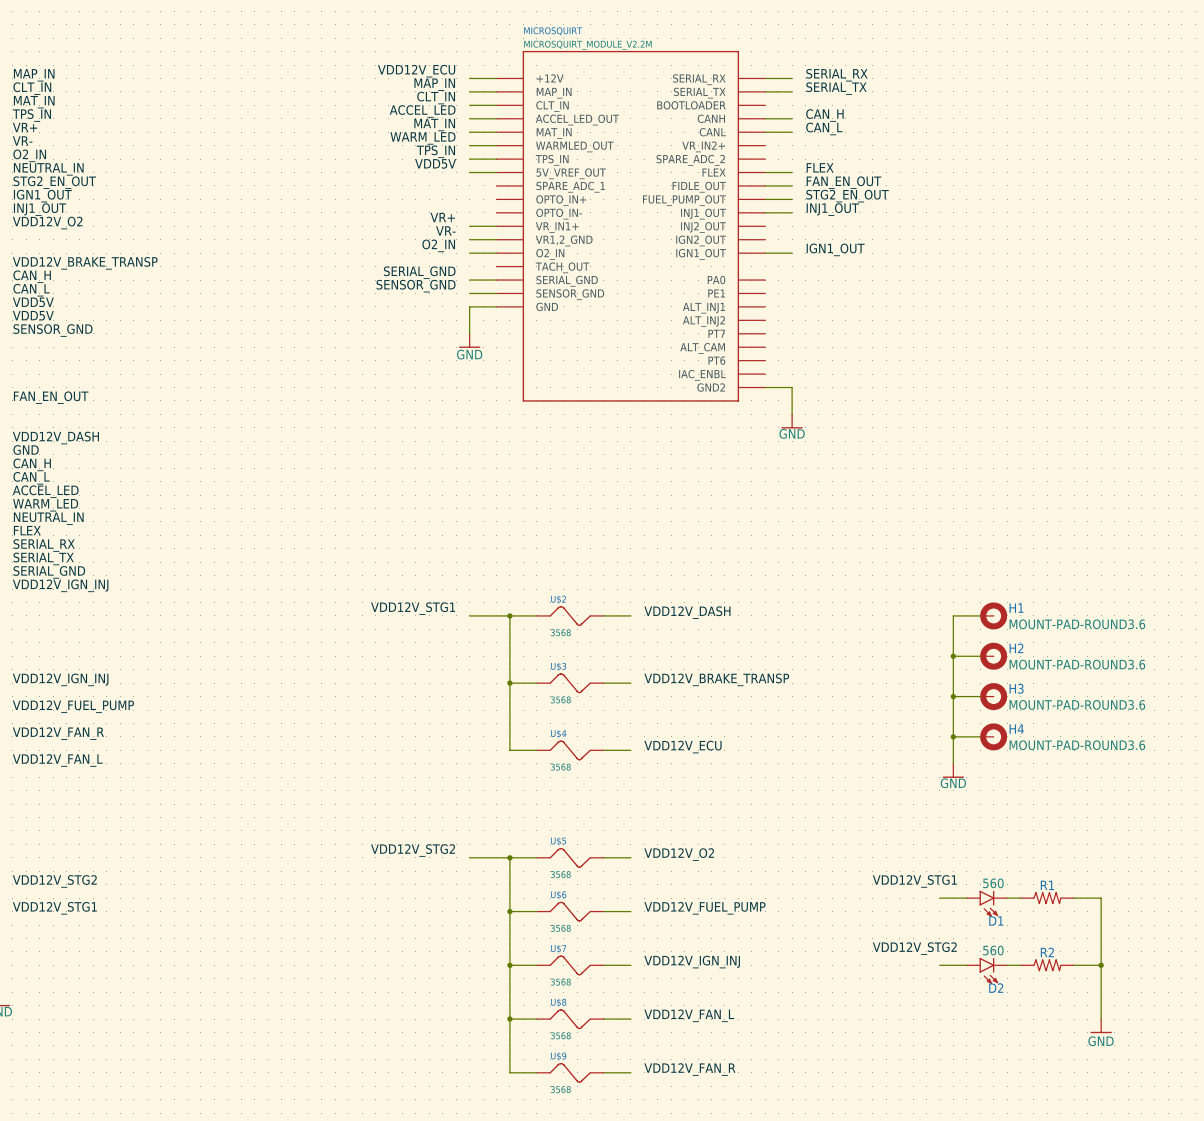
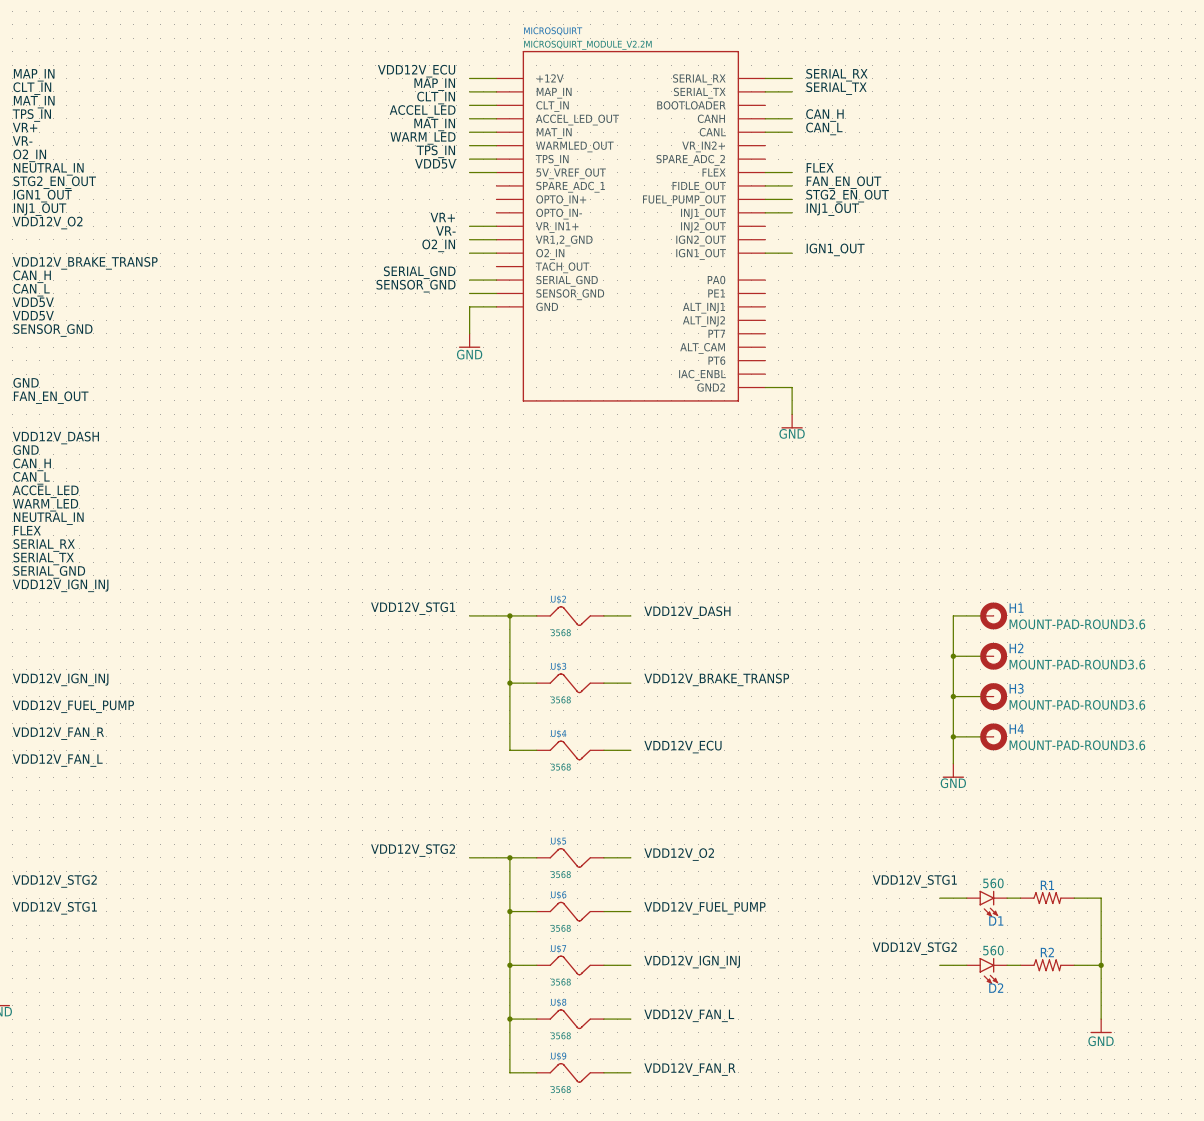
label: none -> GND (26, 382)

